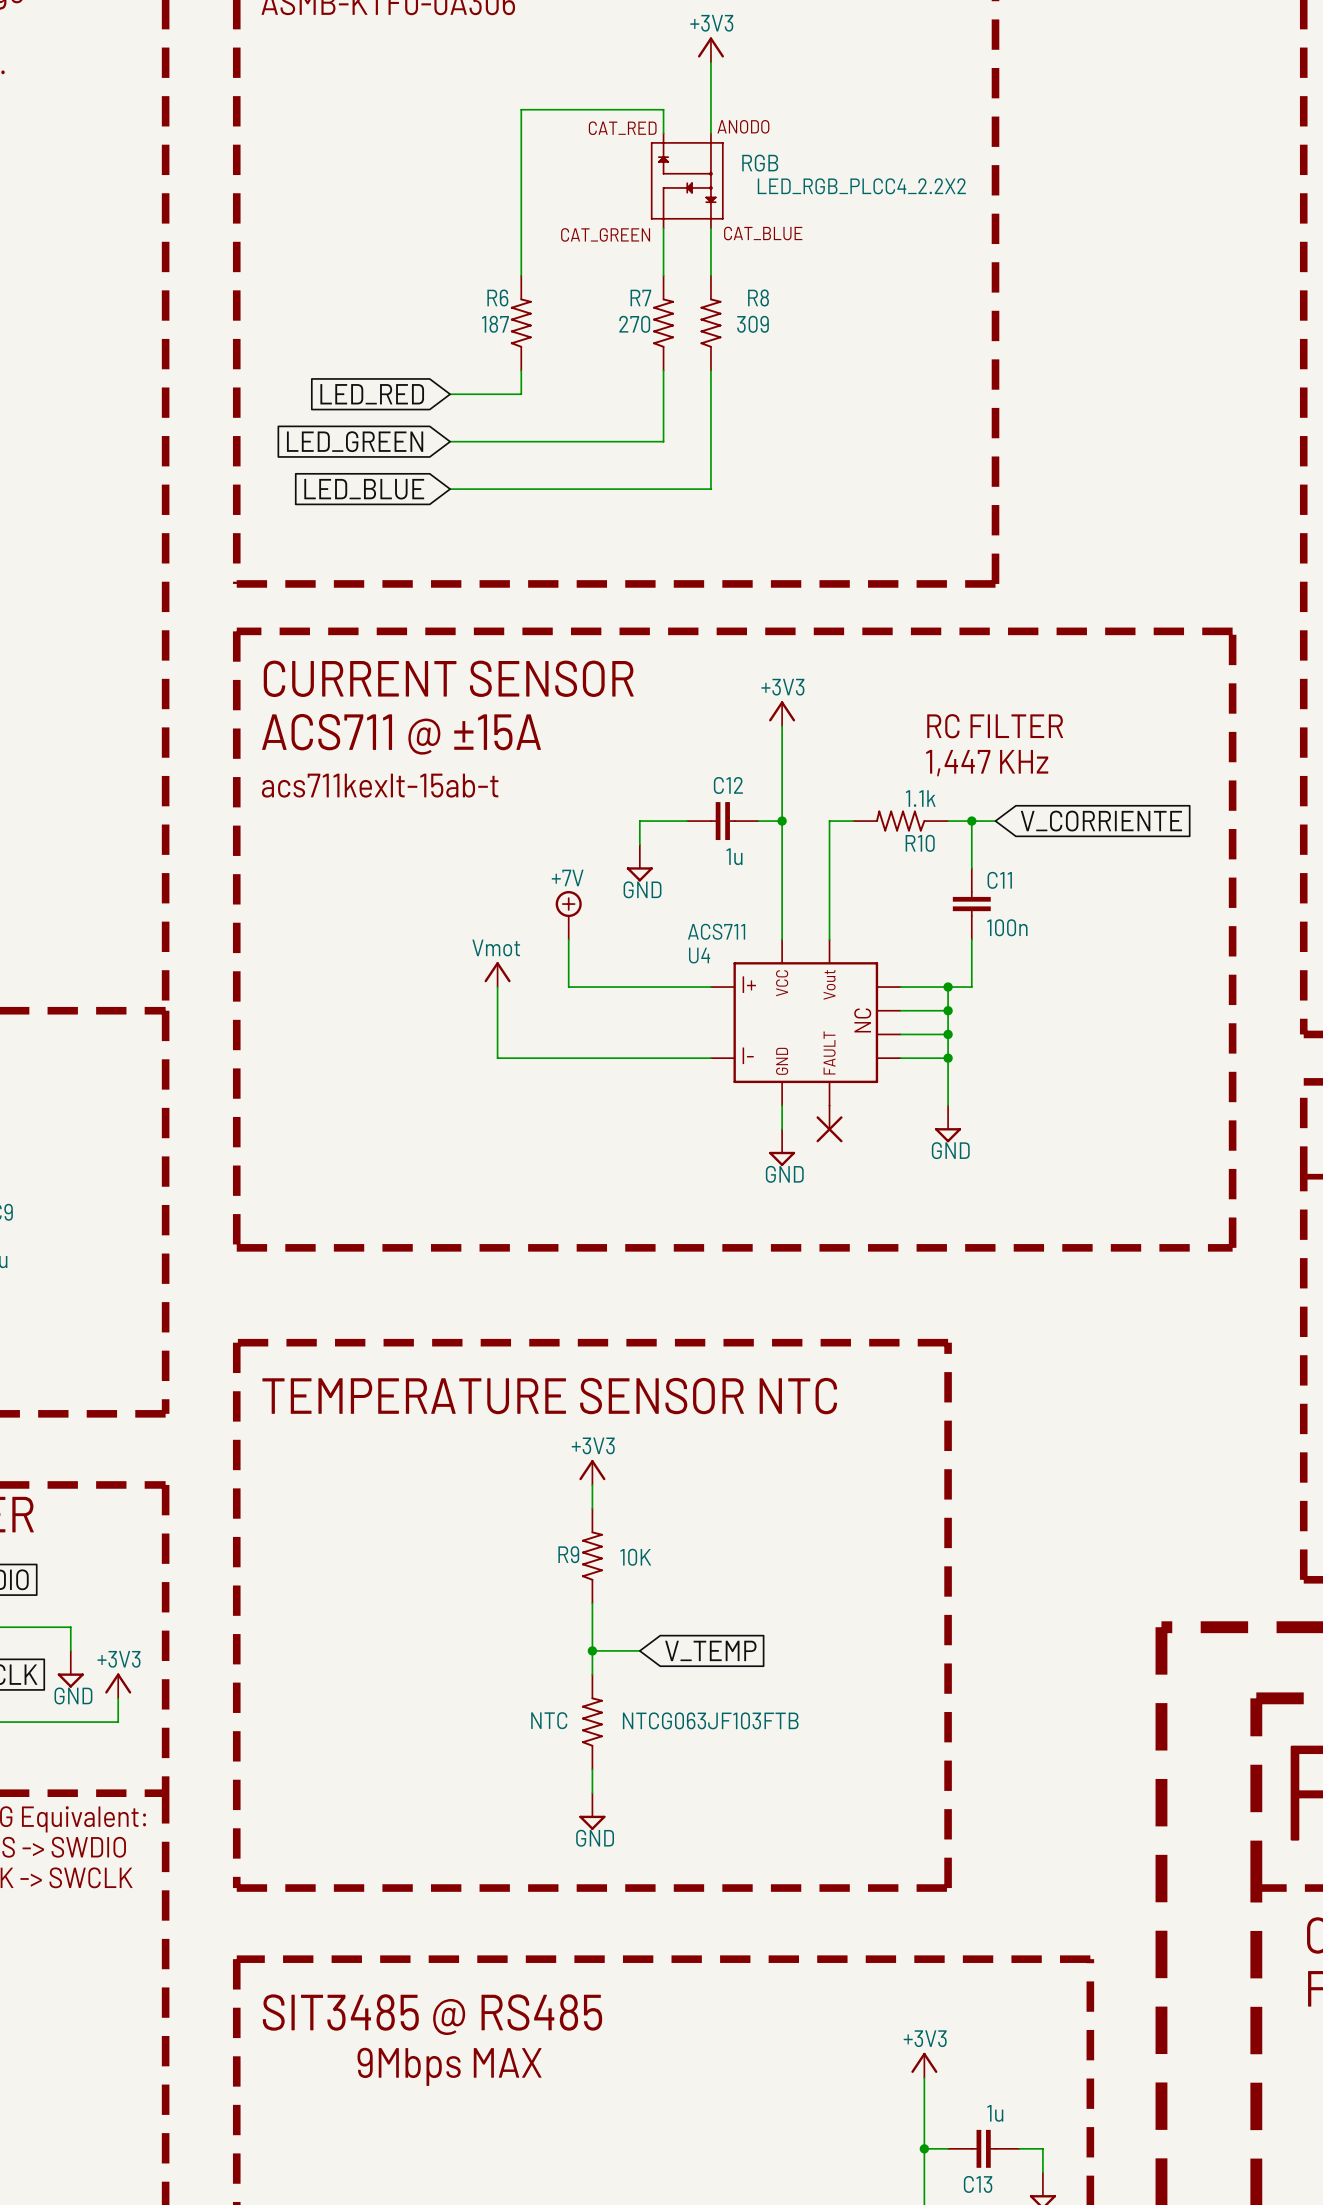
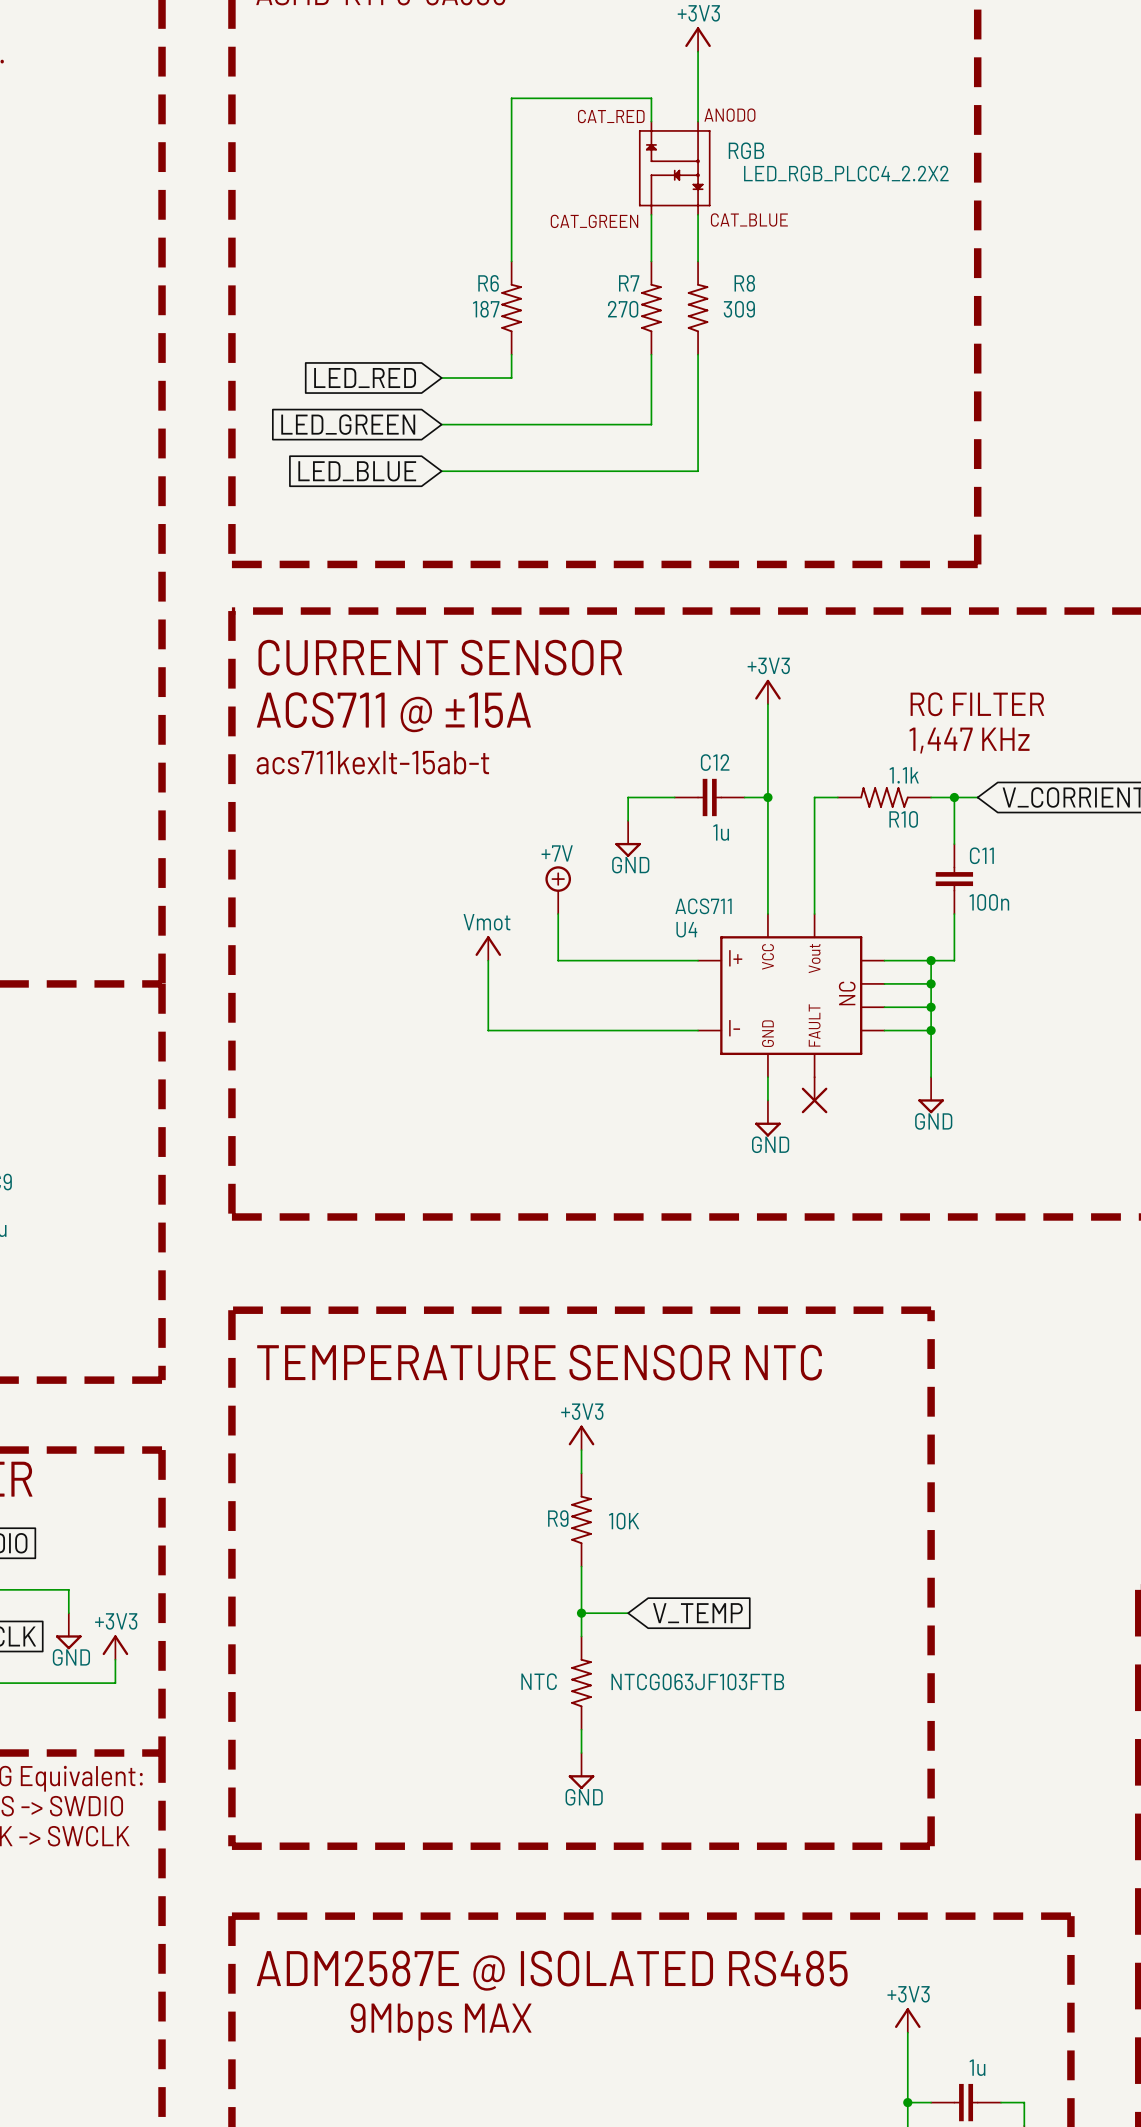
text: SIT3485 @ RS485 (432, 2014) -> ADM2587E @ ISOLATED RS485 (552, 1970)

